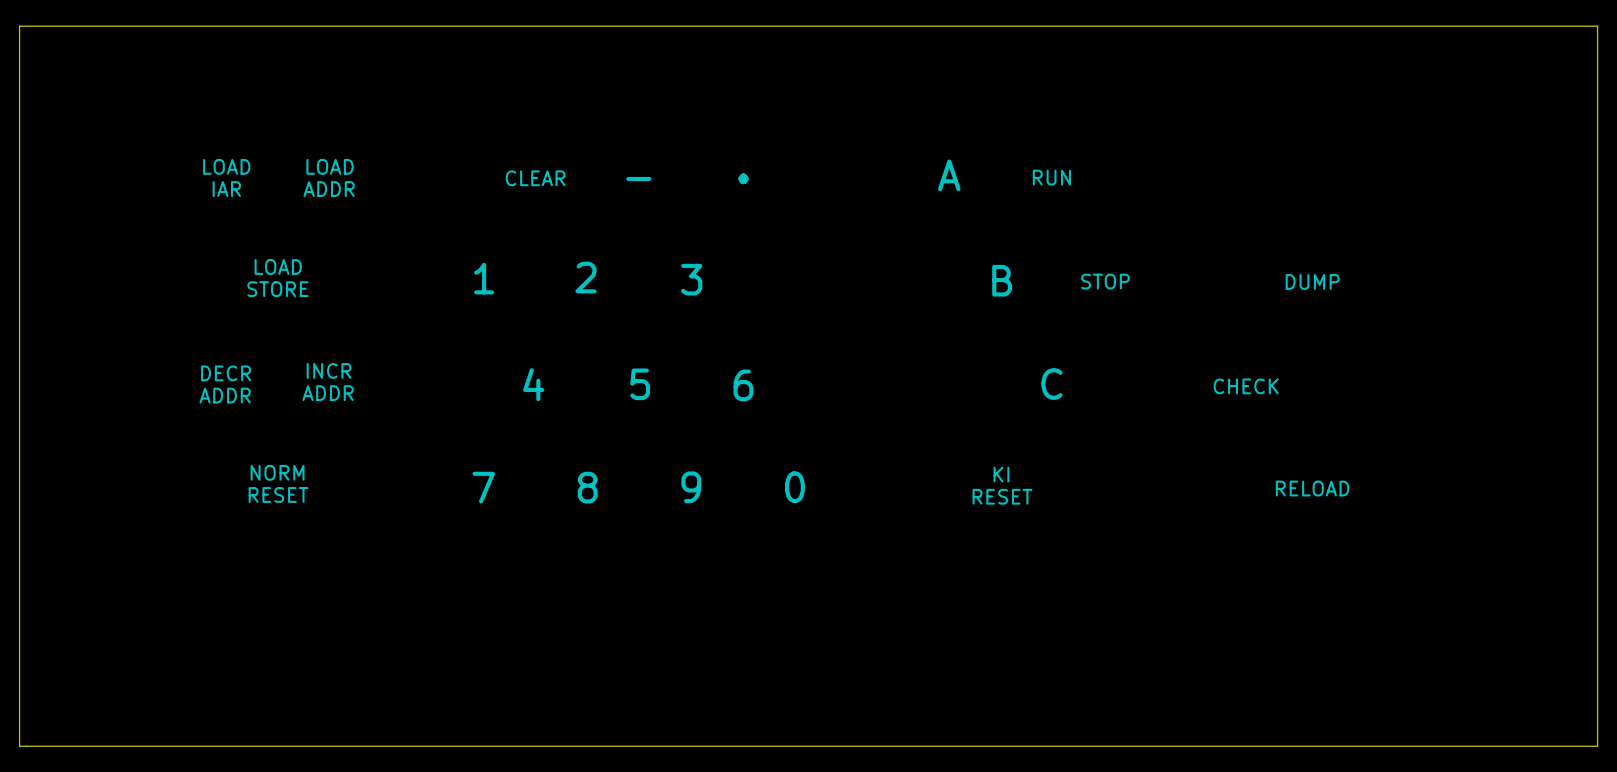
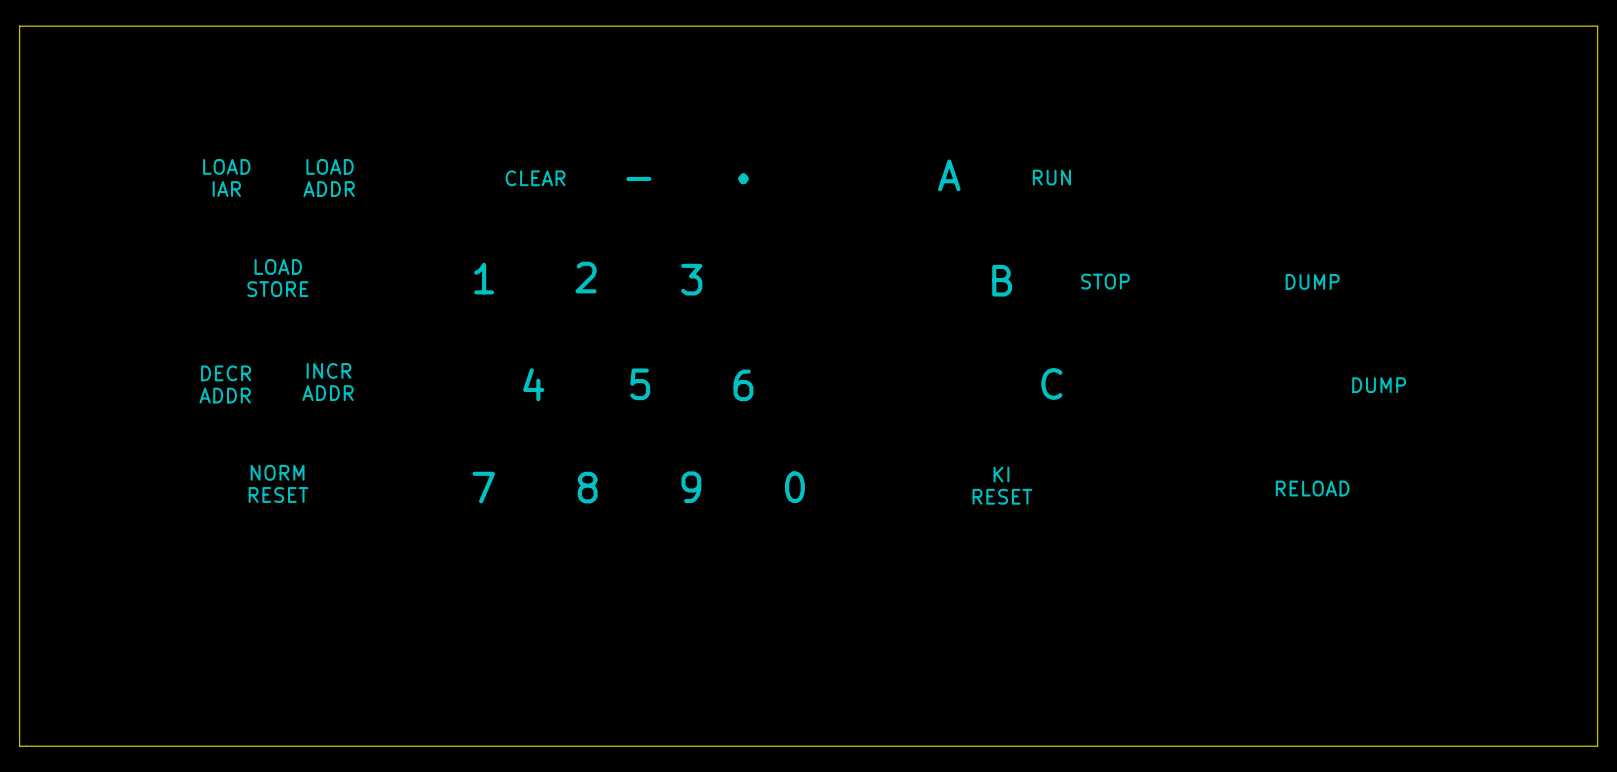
text: none -> DUMP (1379, 385)
text: CHECK (1246, 386) -> none

